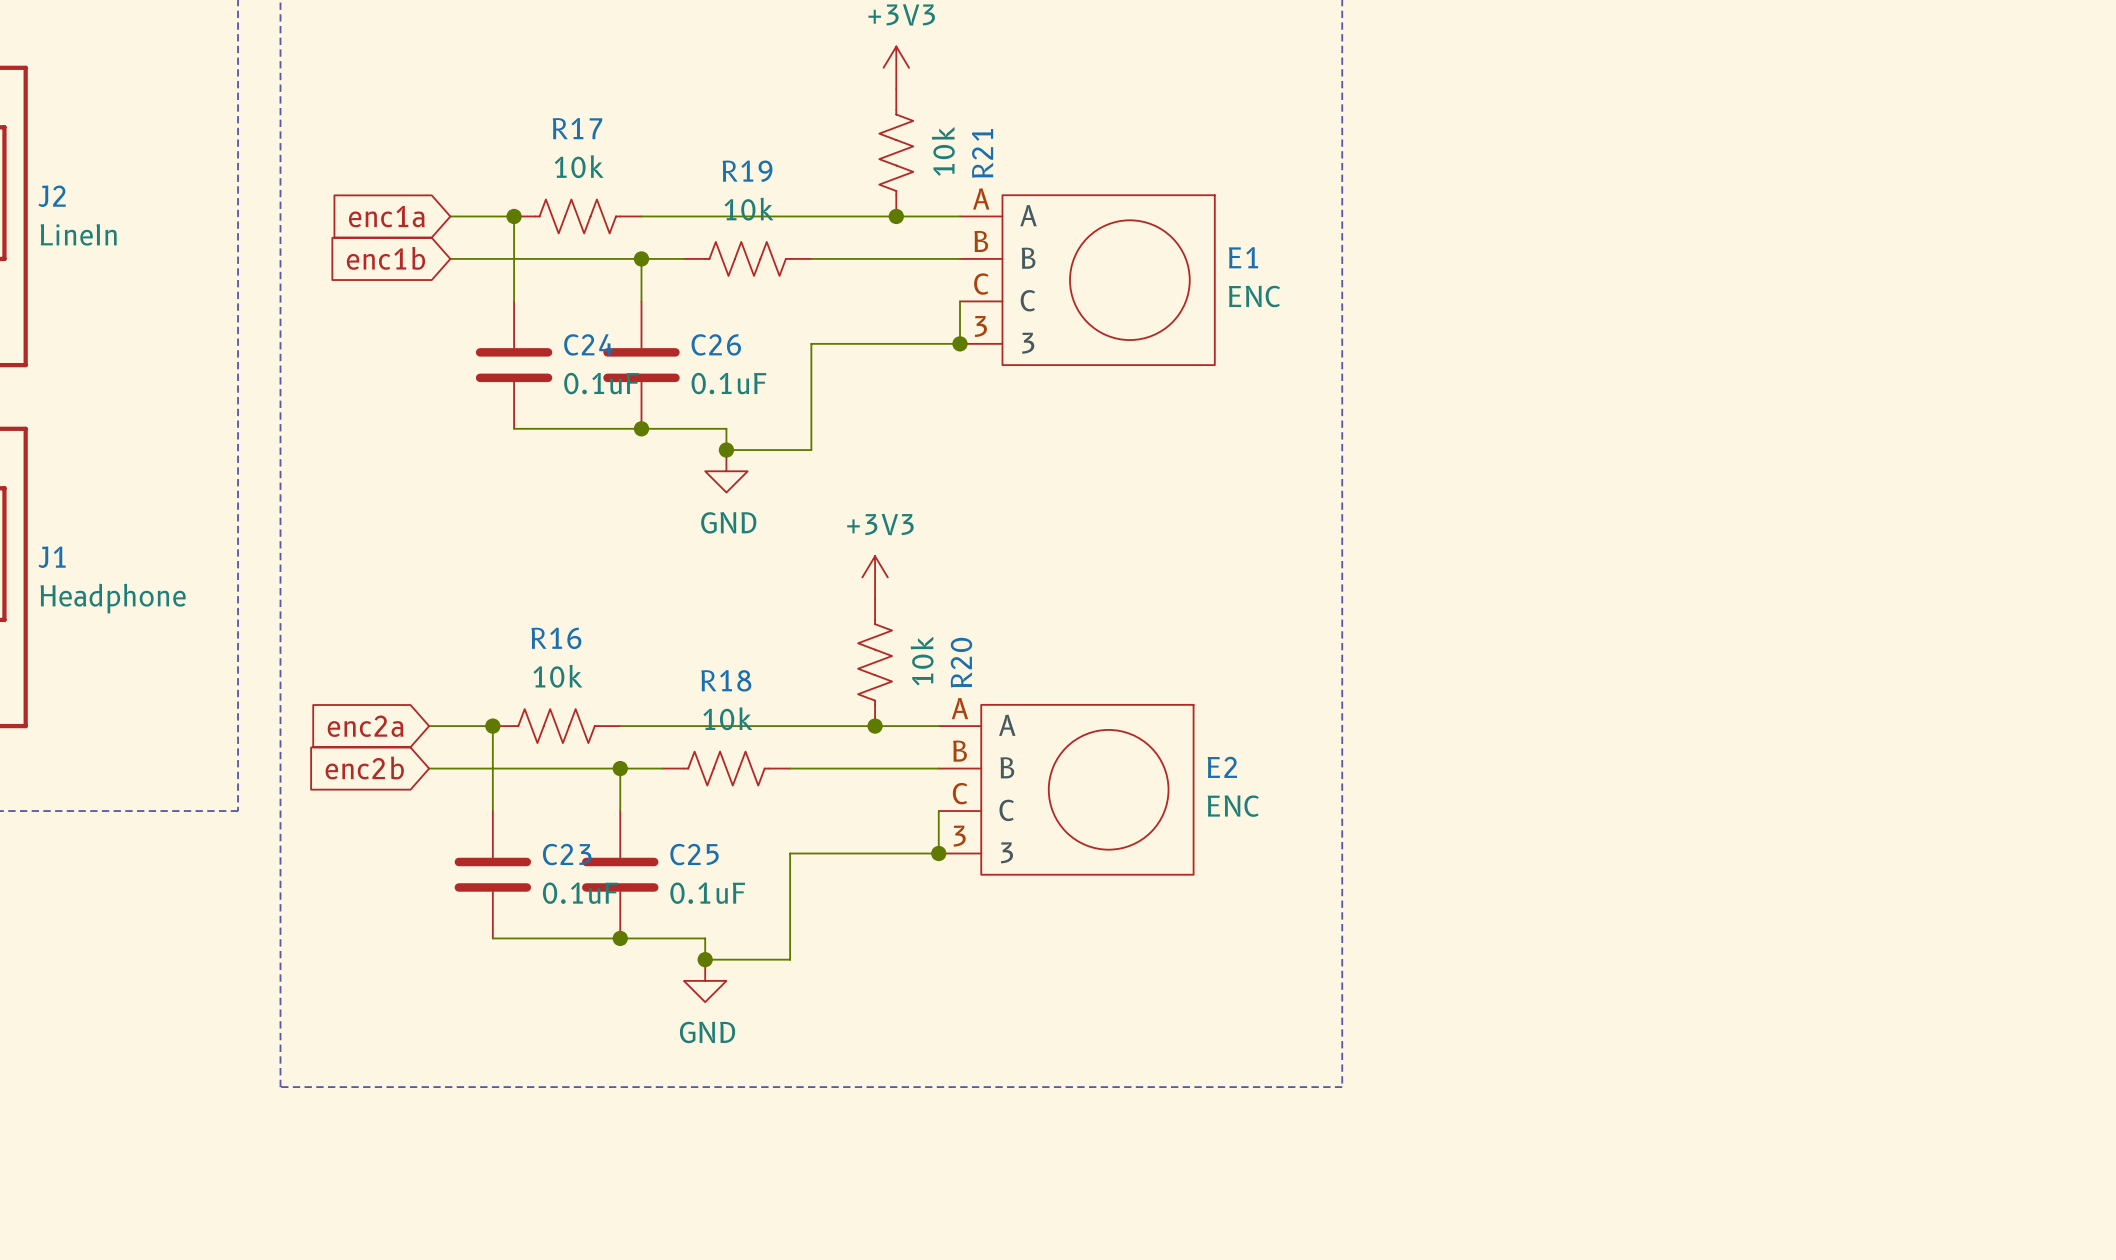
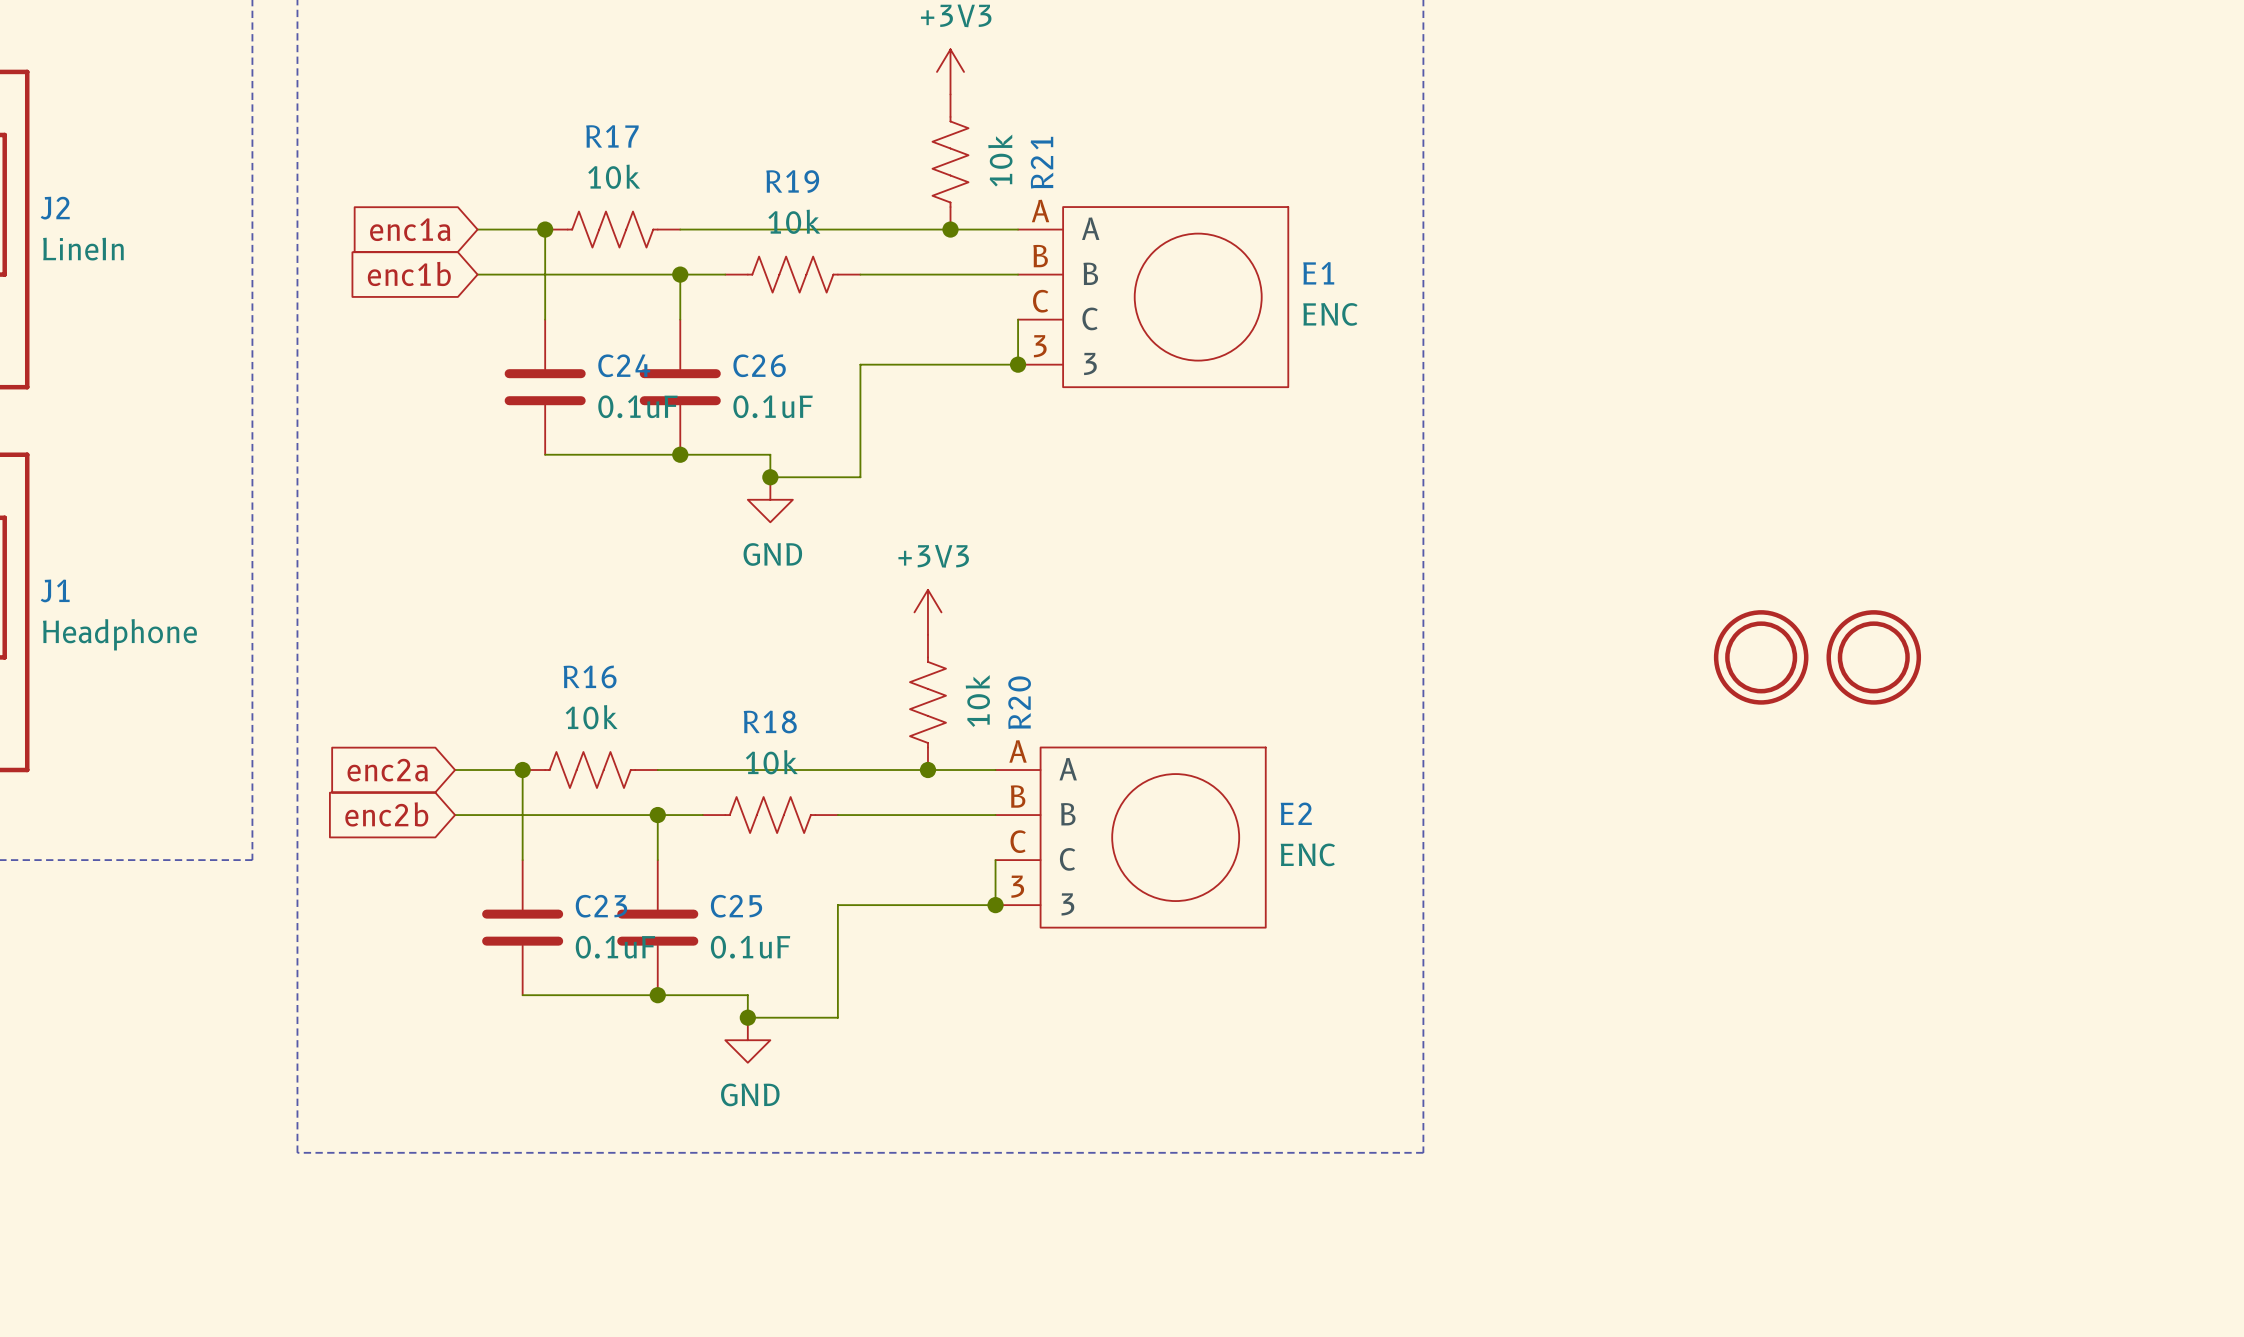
part: none -> (1761, 657)
part: none -> (1873, 657)

